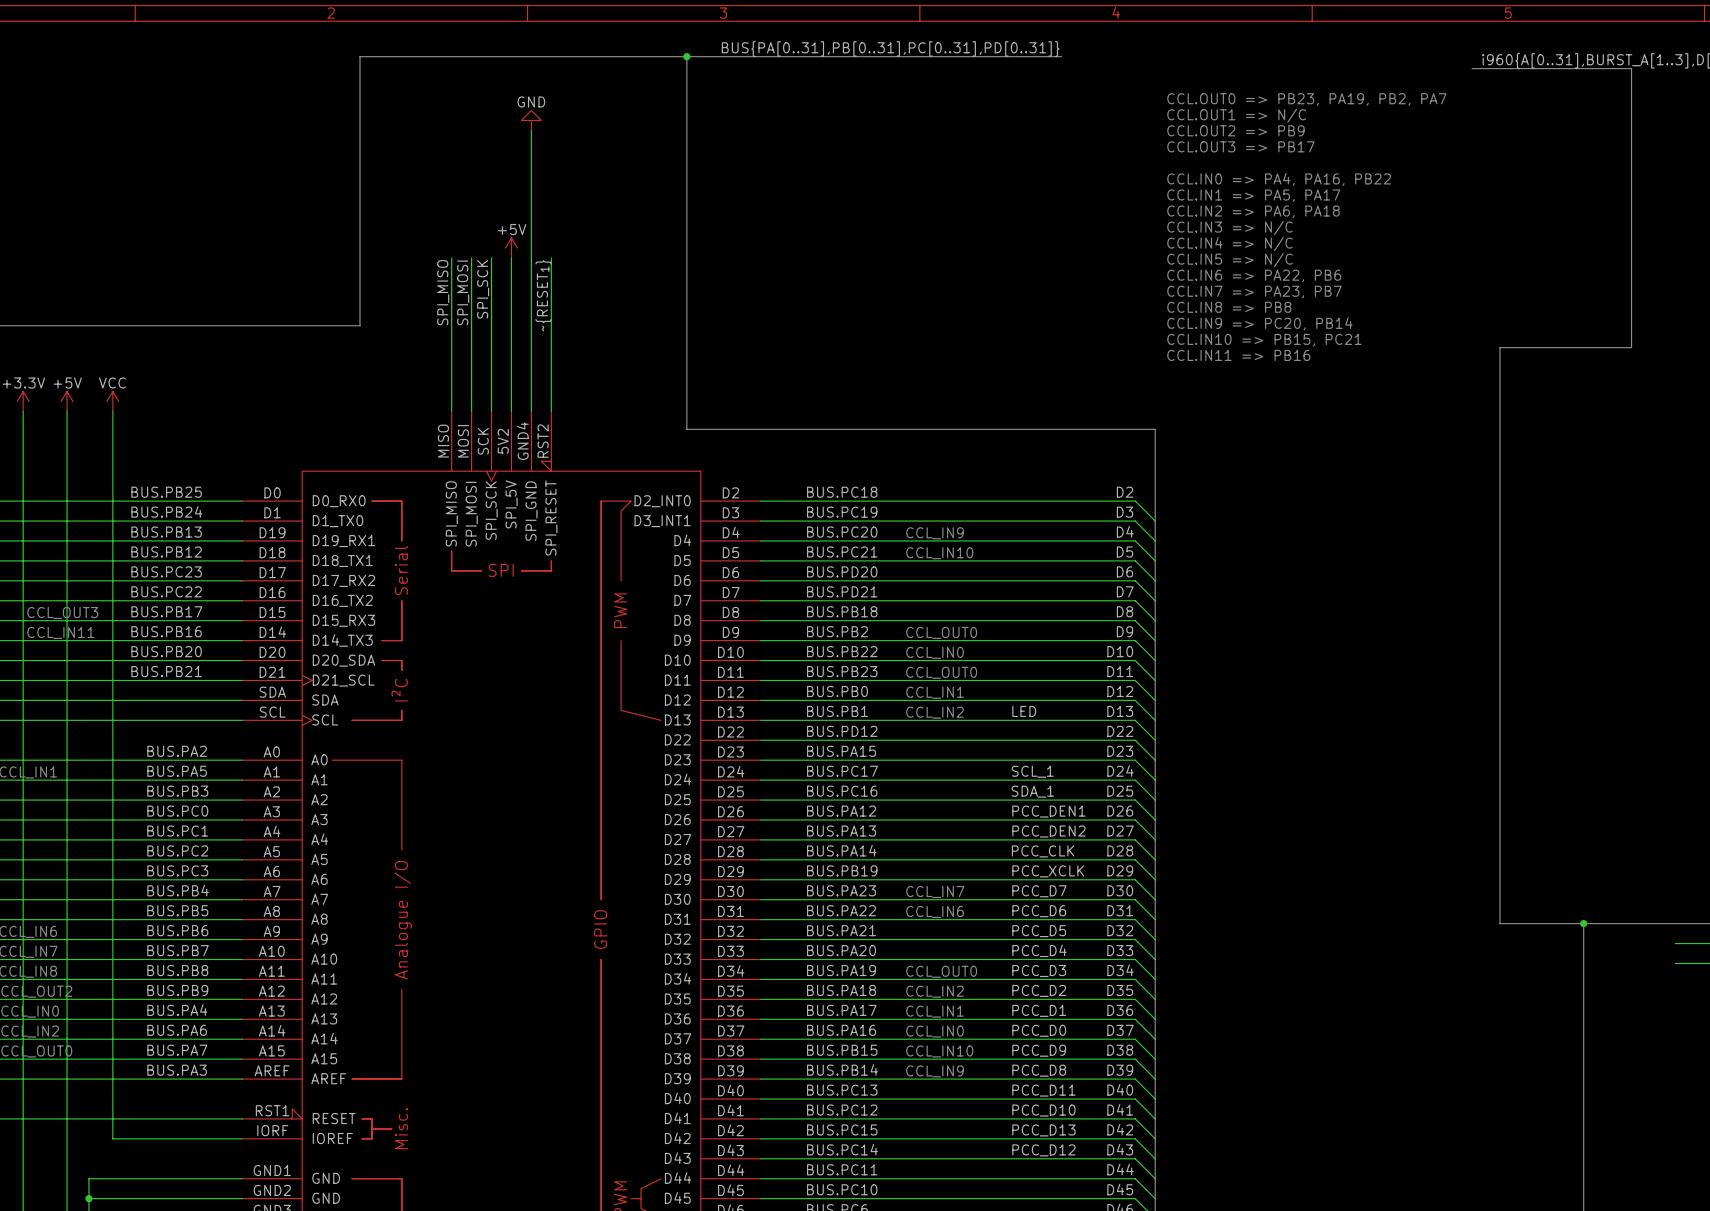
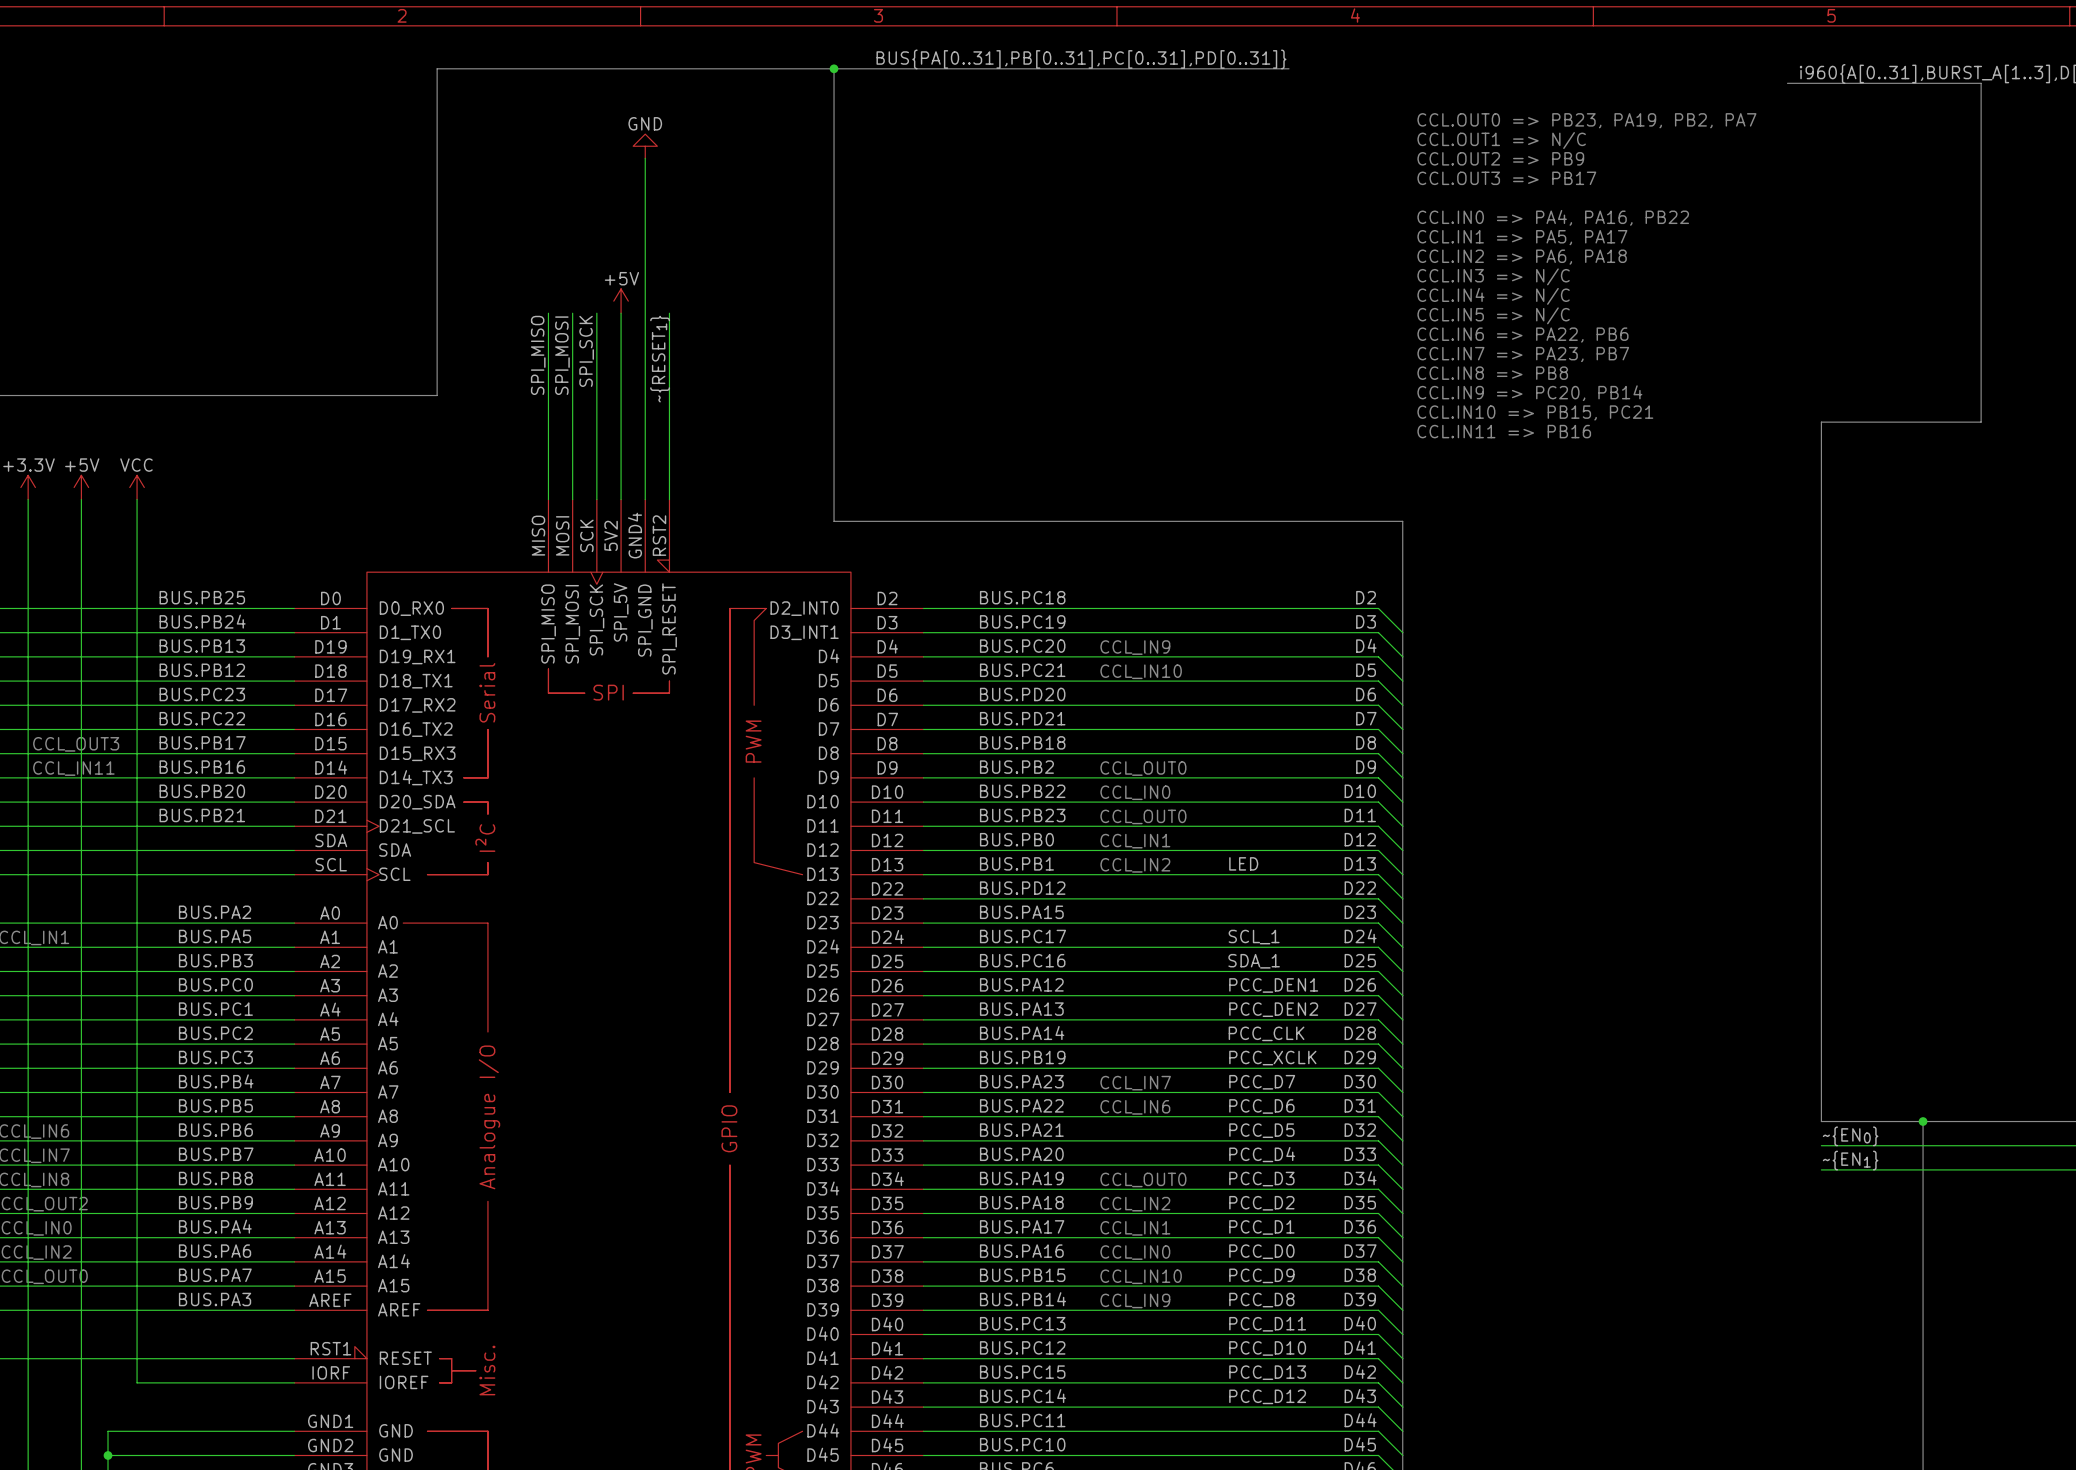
label: none -> ~{EN0} (1850, 1136)
wire: none -> (1821, 1145) (2034, 1145)
label: none -> ~{EN1} (1850, 1160)
wire: none -> (1821, 1169) (2034, 1169)

